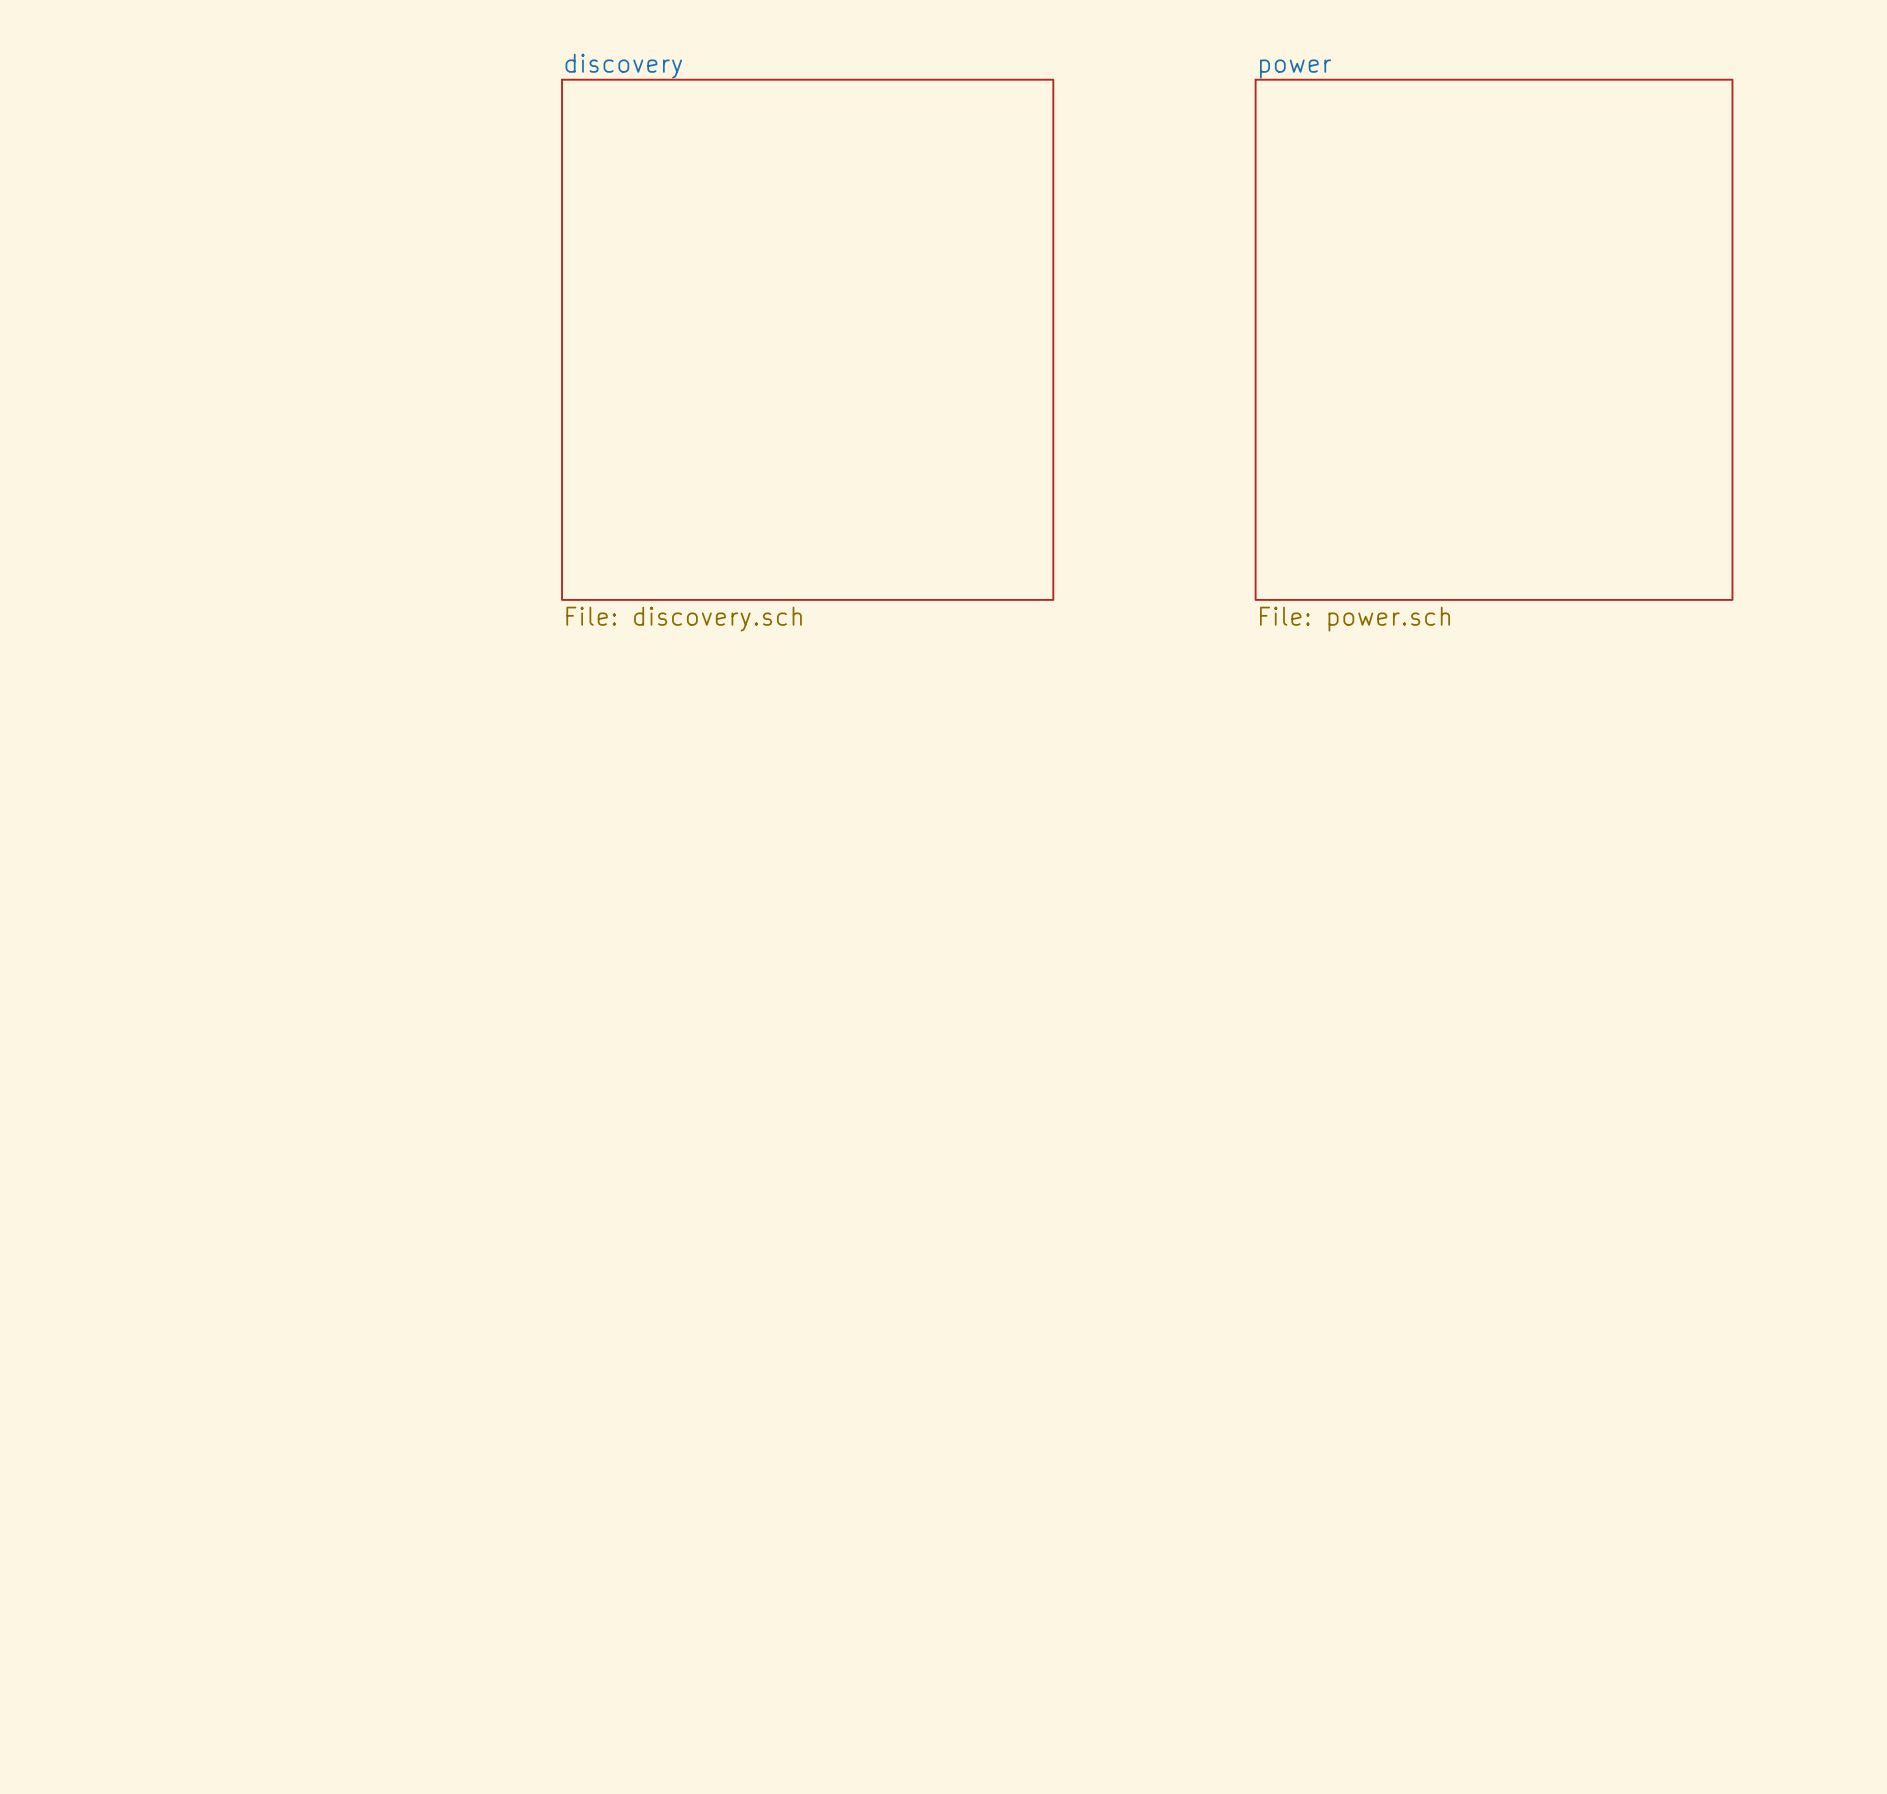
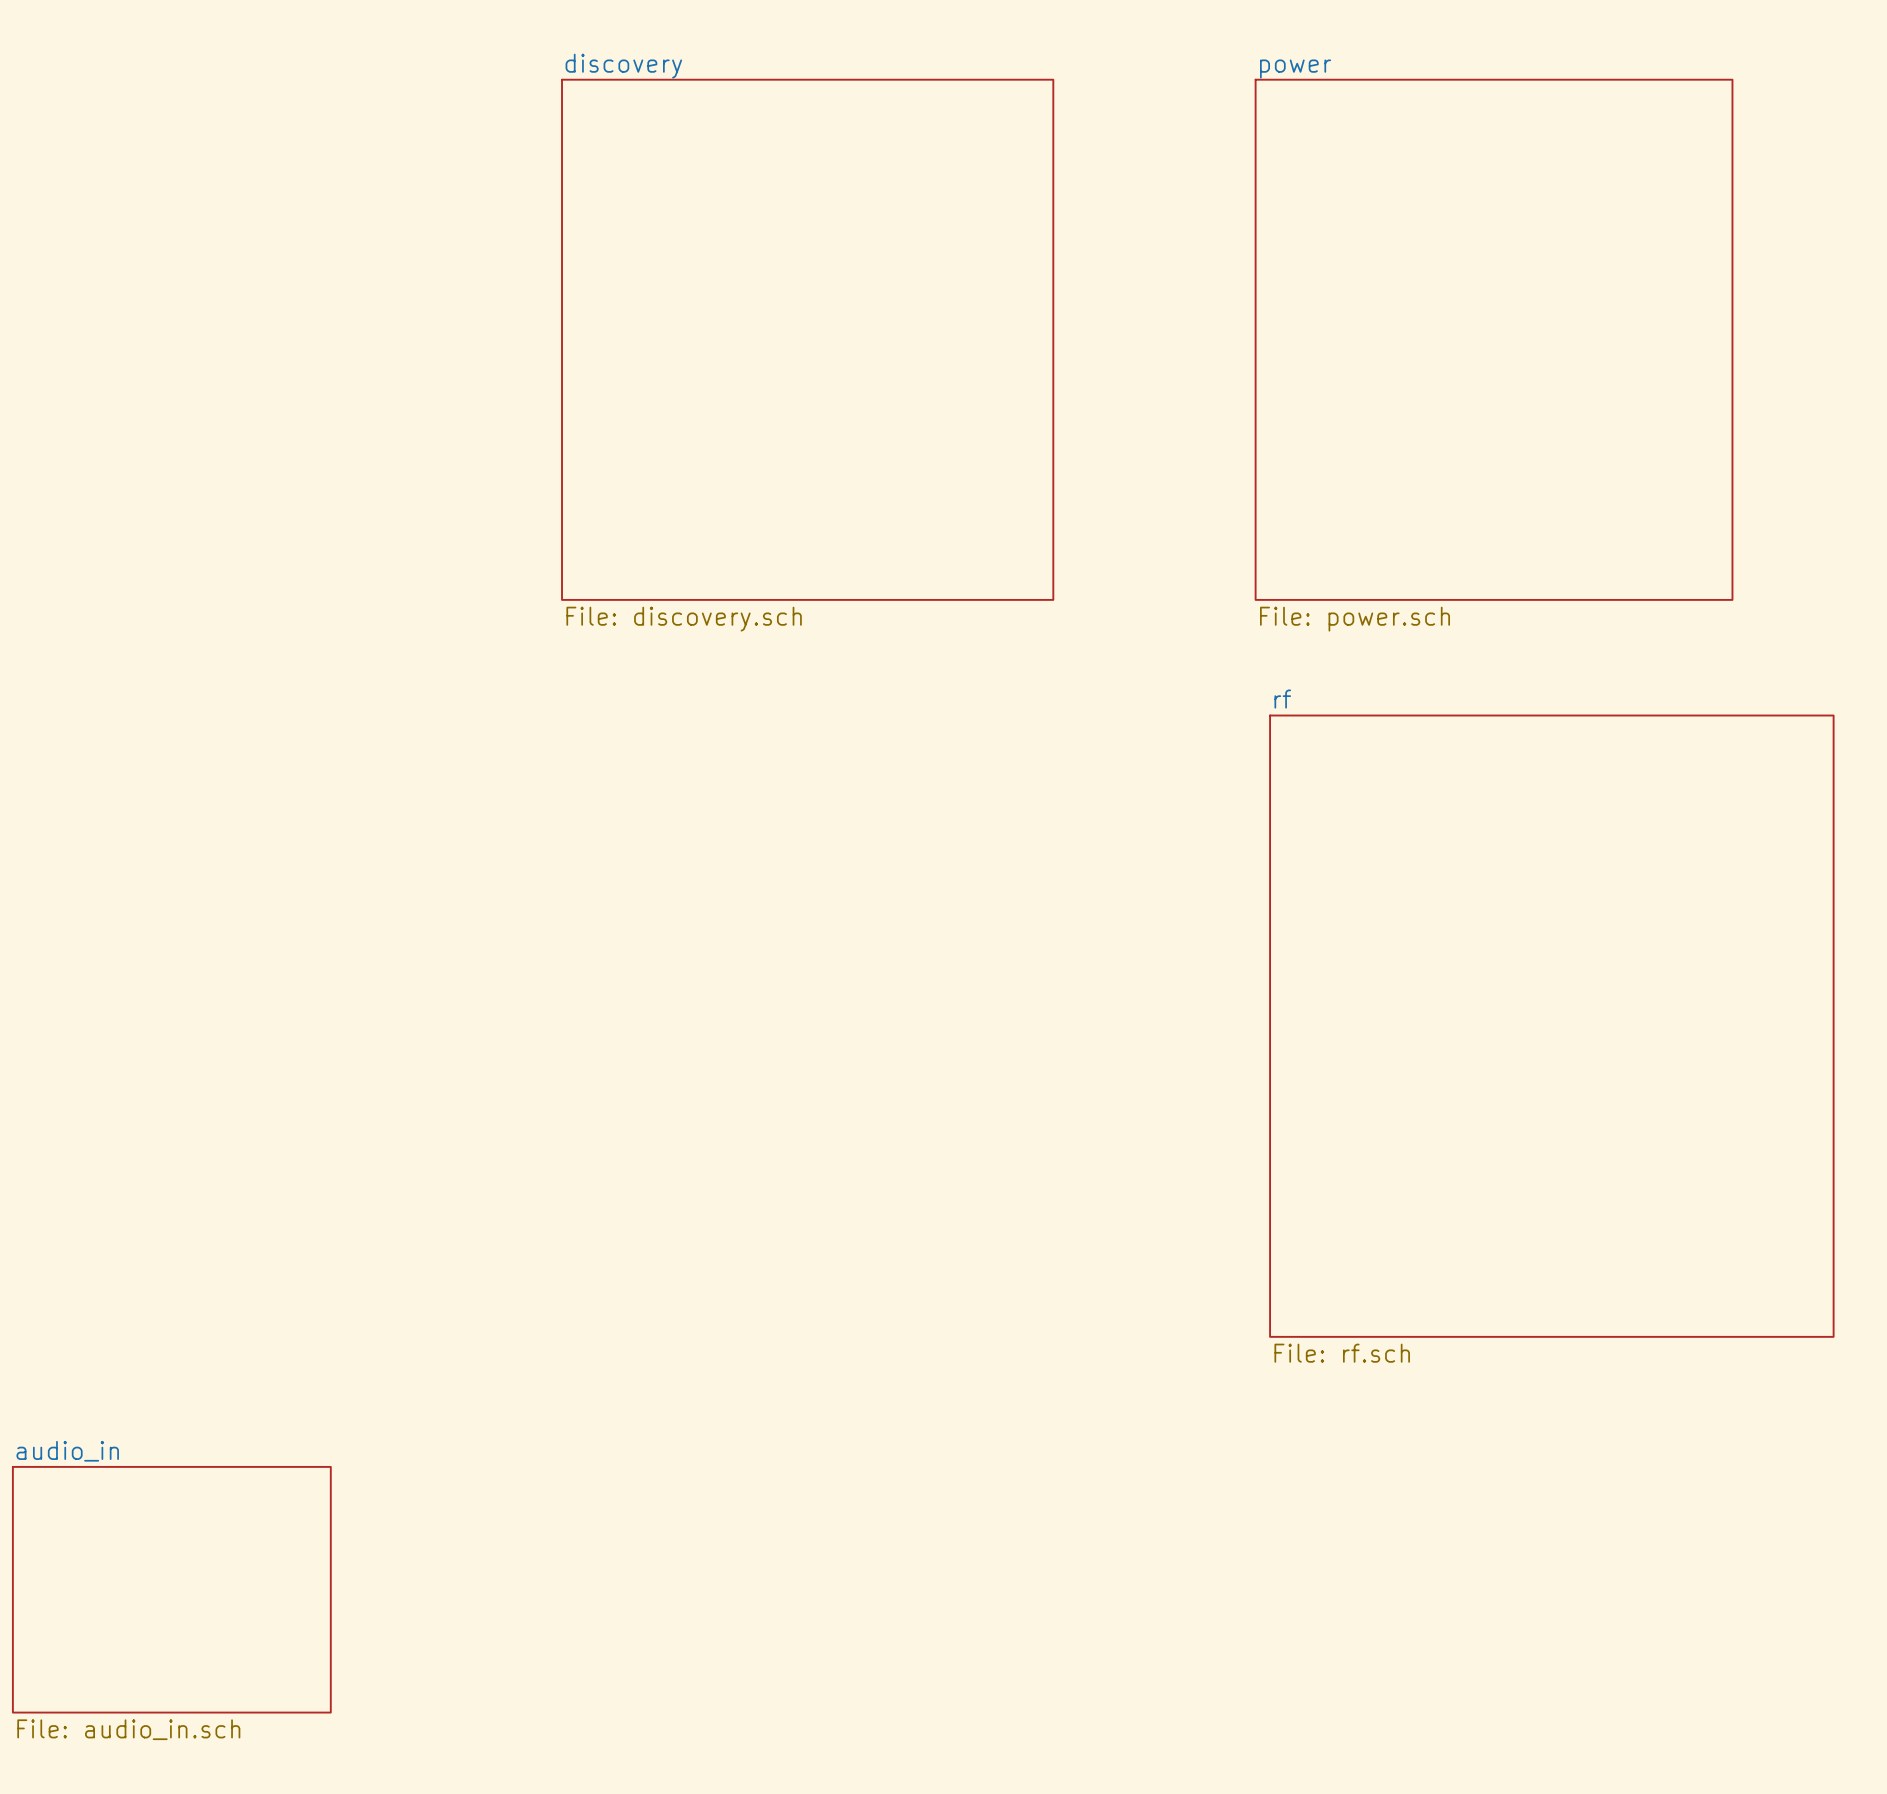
sheet rf: none -> File: rf.sch (1551, 1026)
sheet audio_in: none -> File: audio_in.sch (171, 1589)

